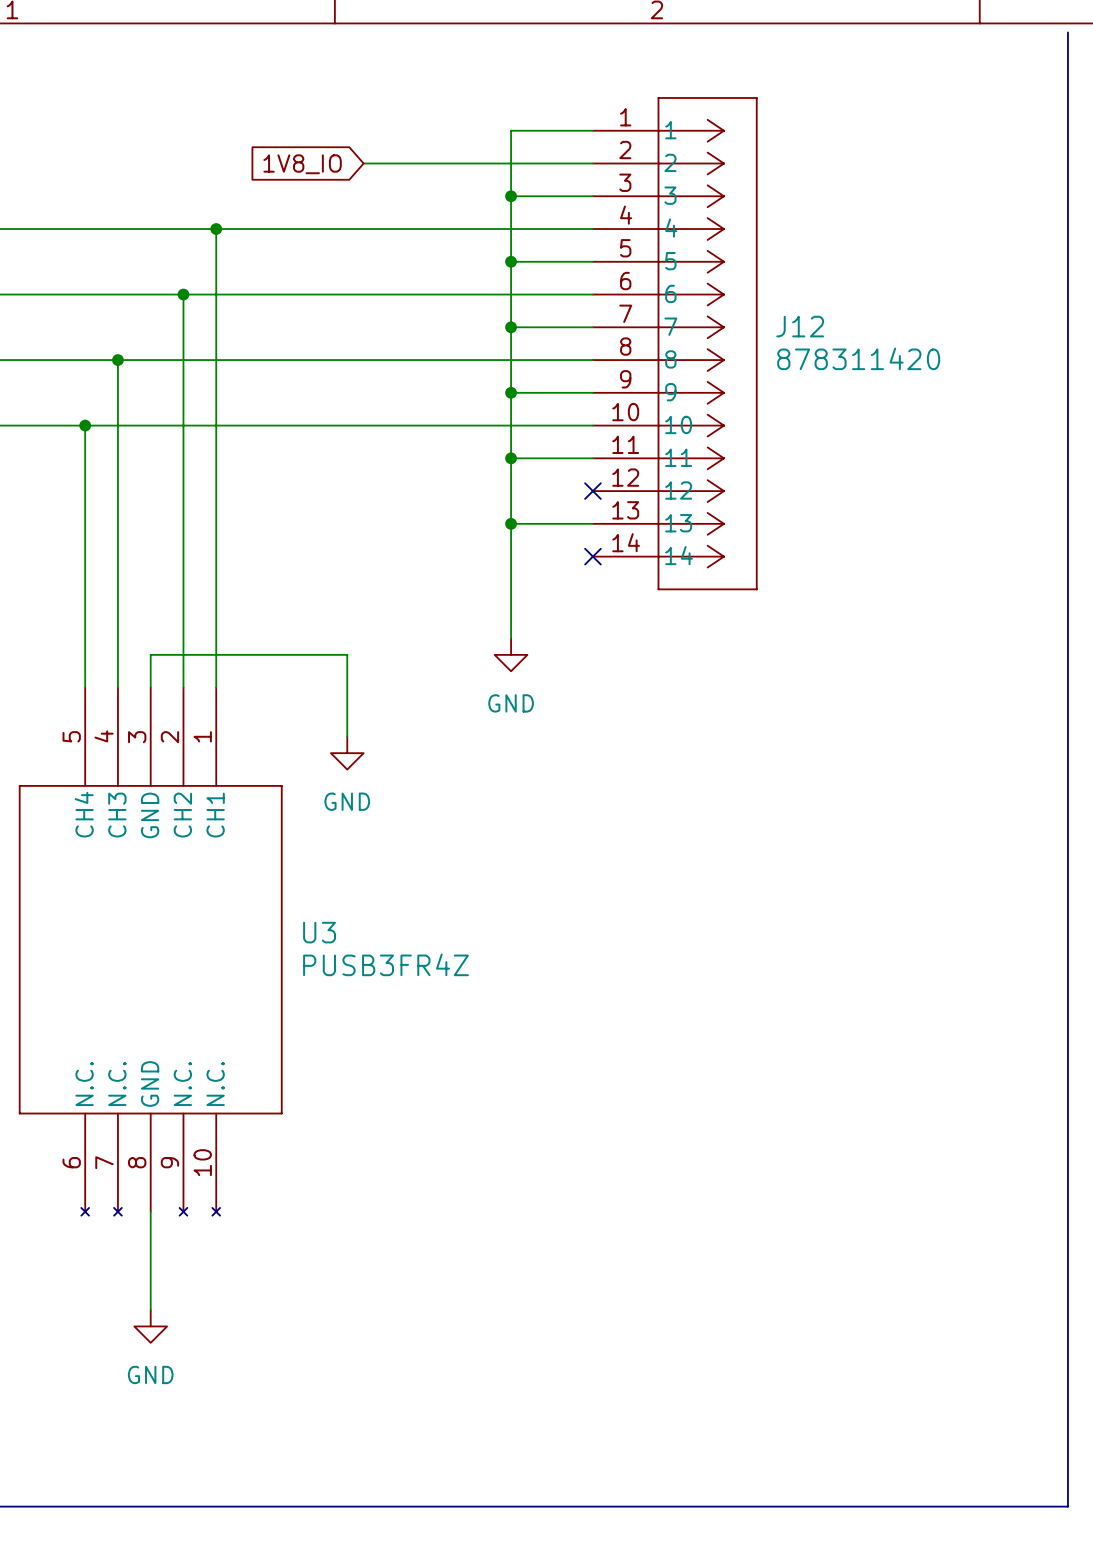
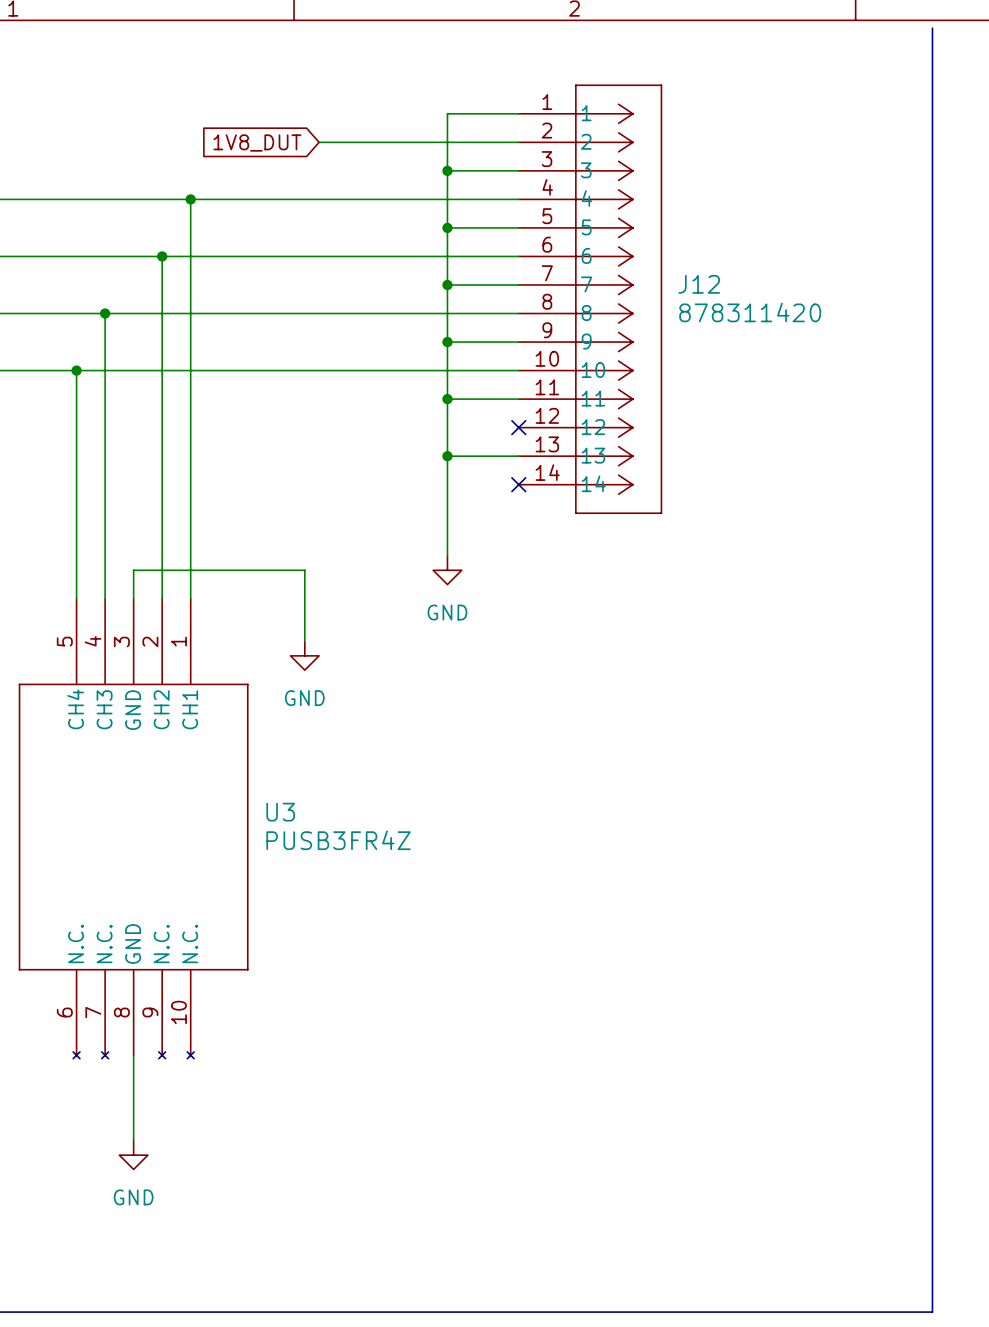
global label: 1V8_IO (302, 164) -> 1V8_DUT (257, 143)

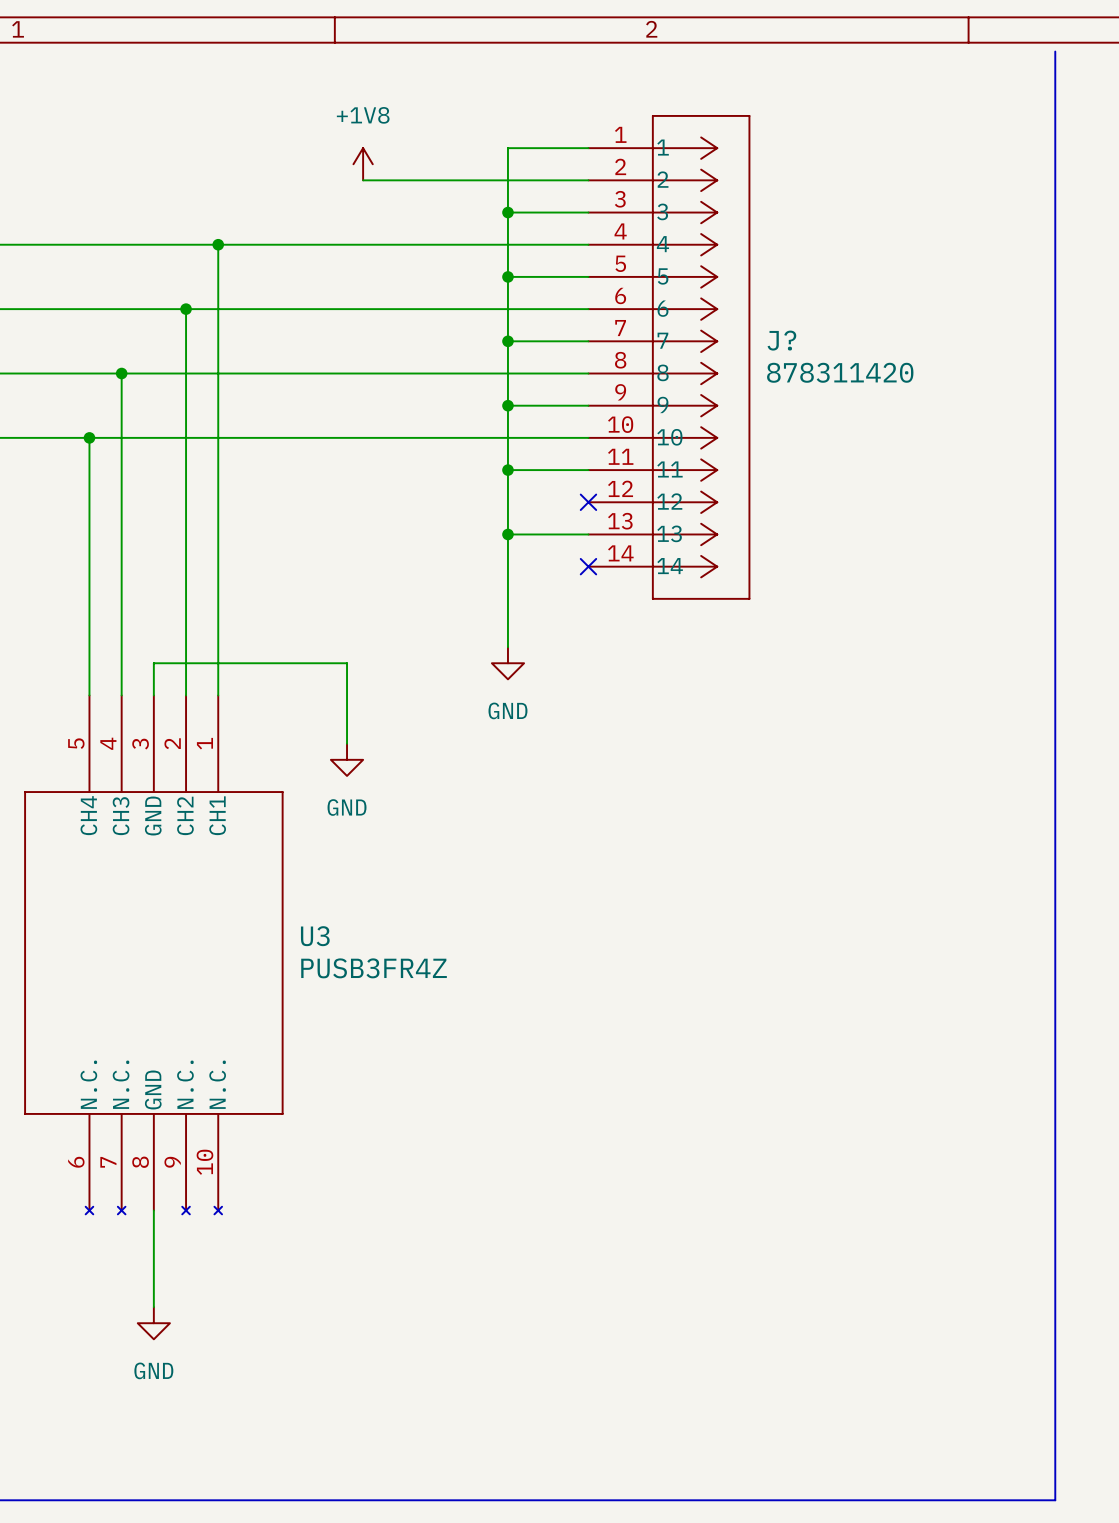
power symbol: none -> +1V8 (363, 164)
global label: 1V8_DUT (257, 143) -> none
J12 name: J12 (699, 284) -> J? (781, 340)

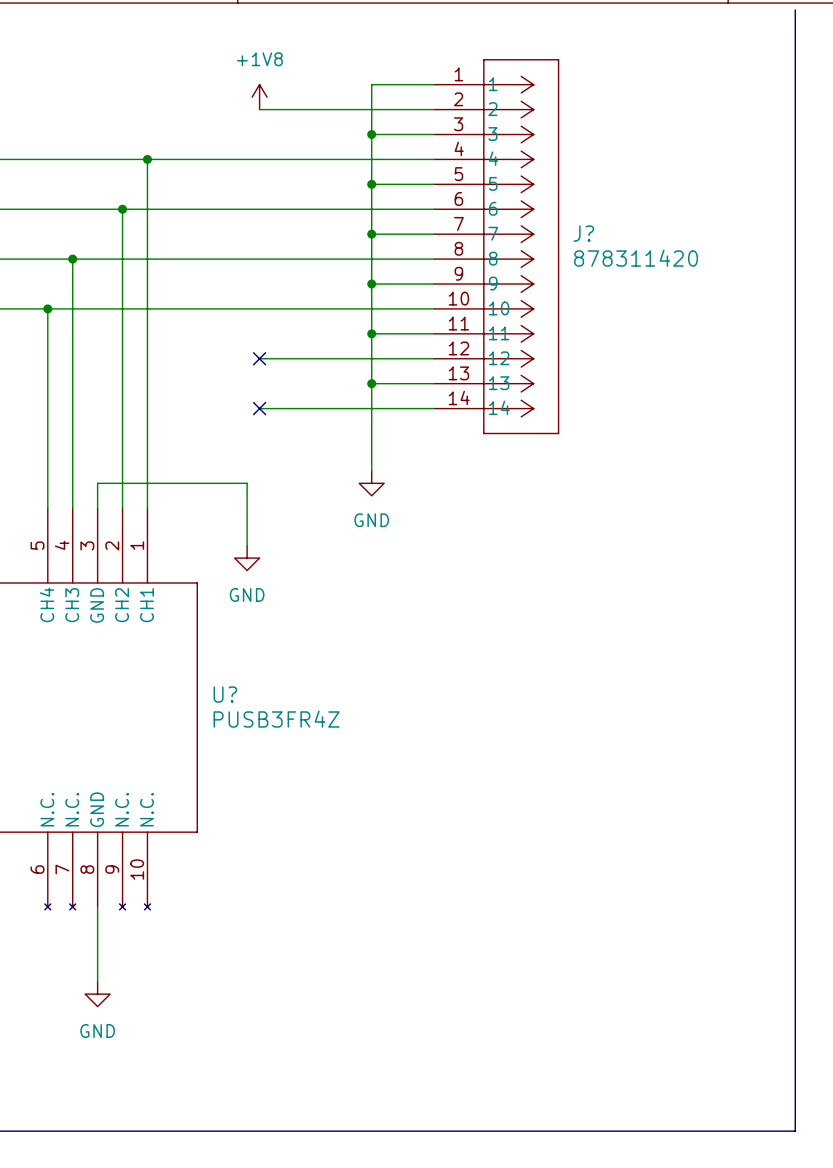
wire: none -> (259, 358) (433, 358)
no-connect mark: none -> (259, 358)
no-connect mark: (588, 502) -> none
wire: none -> (259, 408) (433, 408)
no-connect mark: none -> (259, 408)
no-connect mark: (588, 566) -> none
U3 name: U3 (315, 936) -> U? (225, 694)

